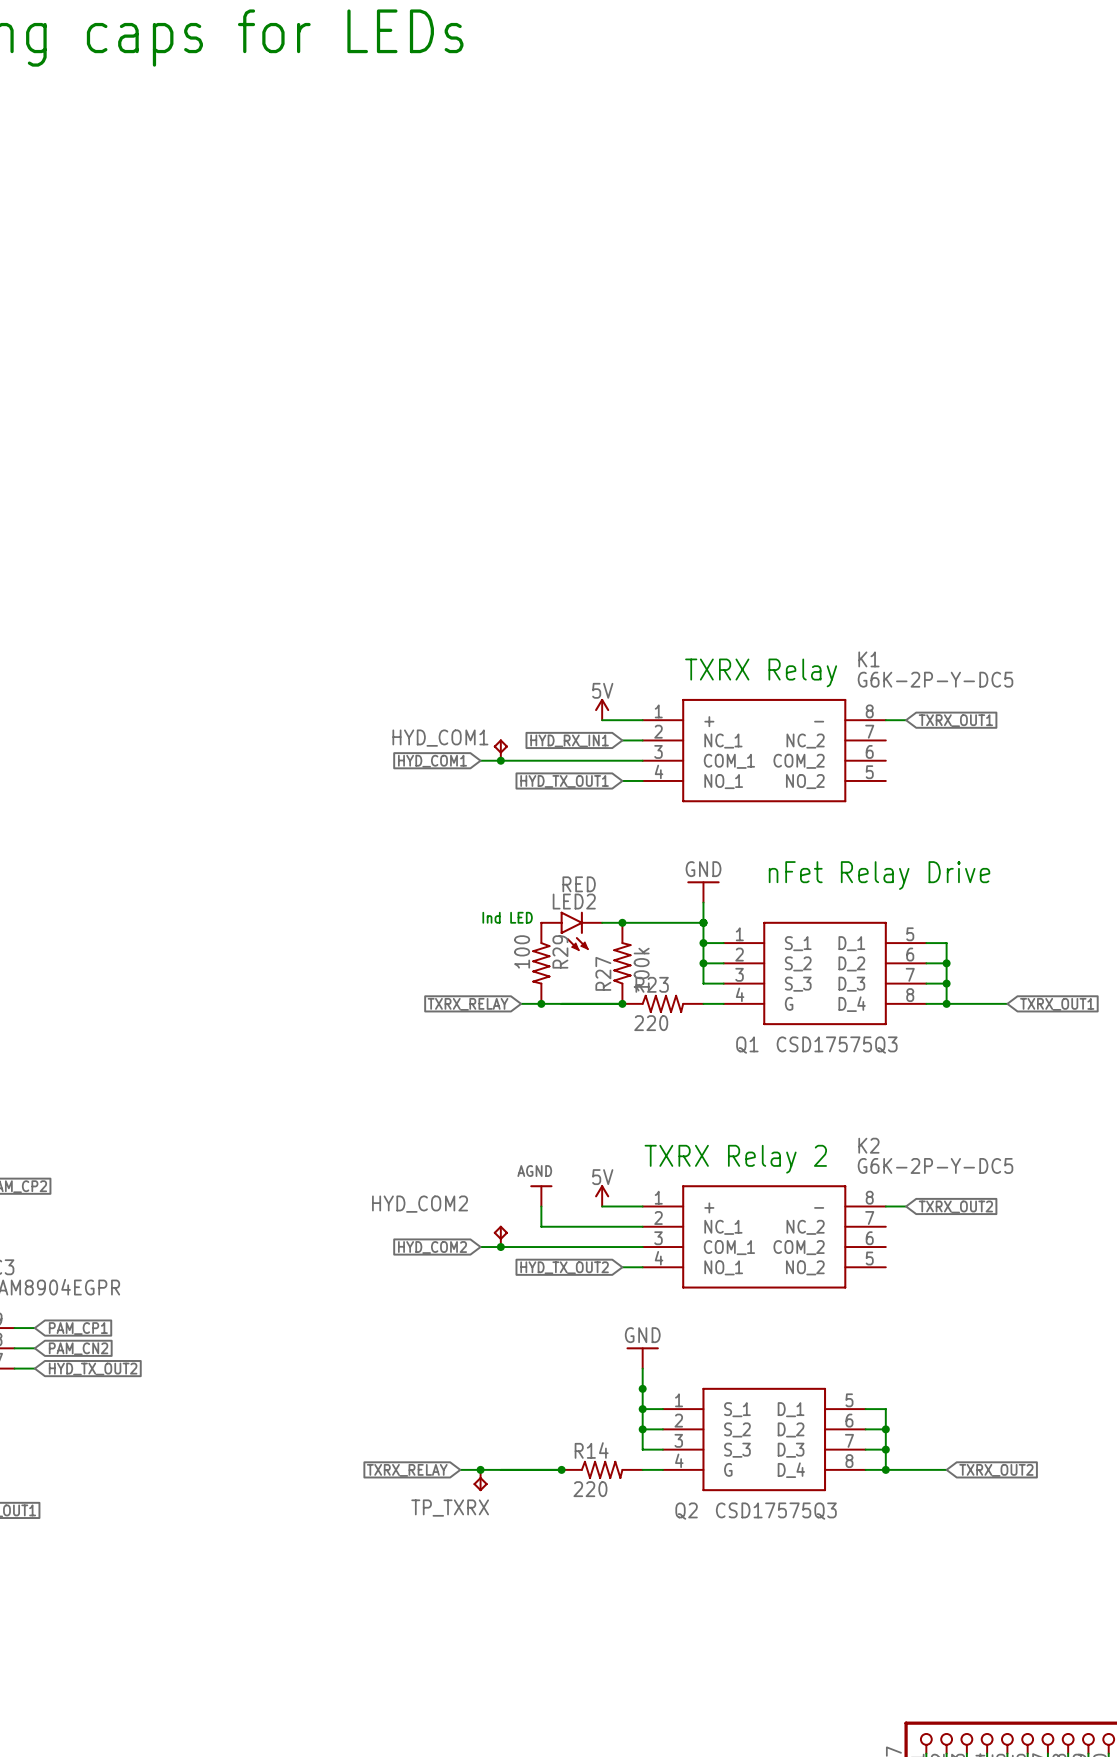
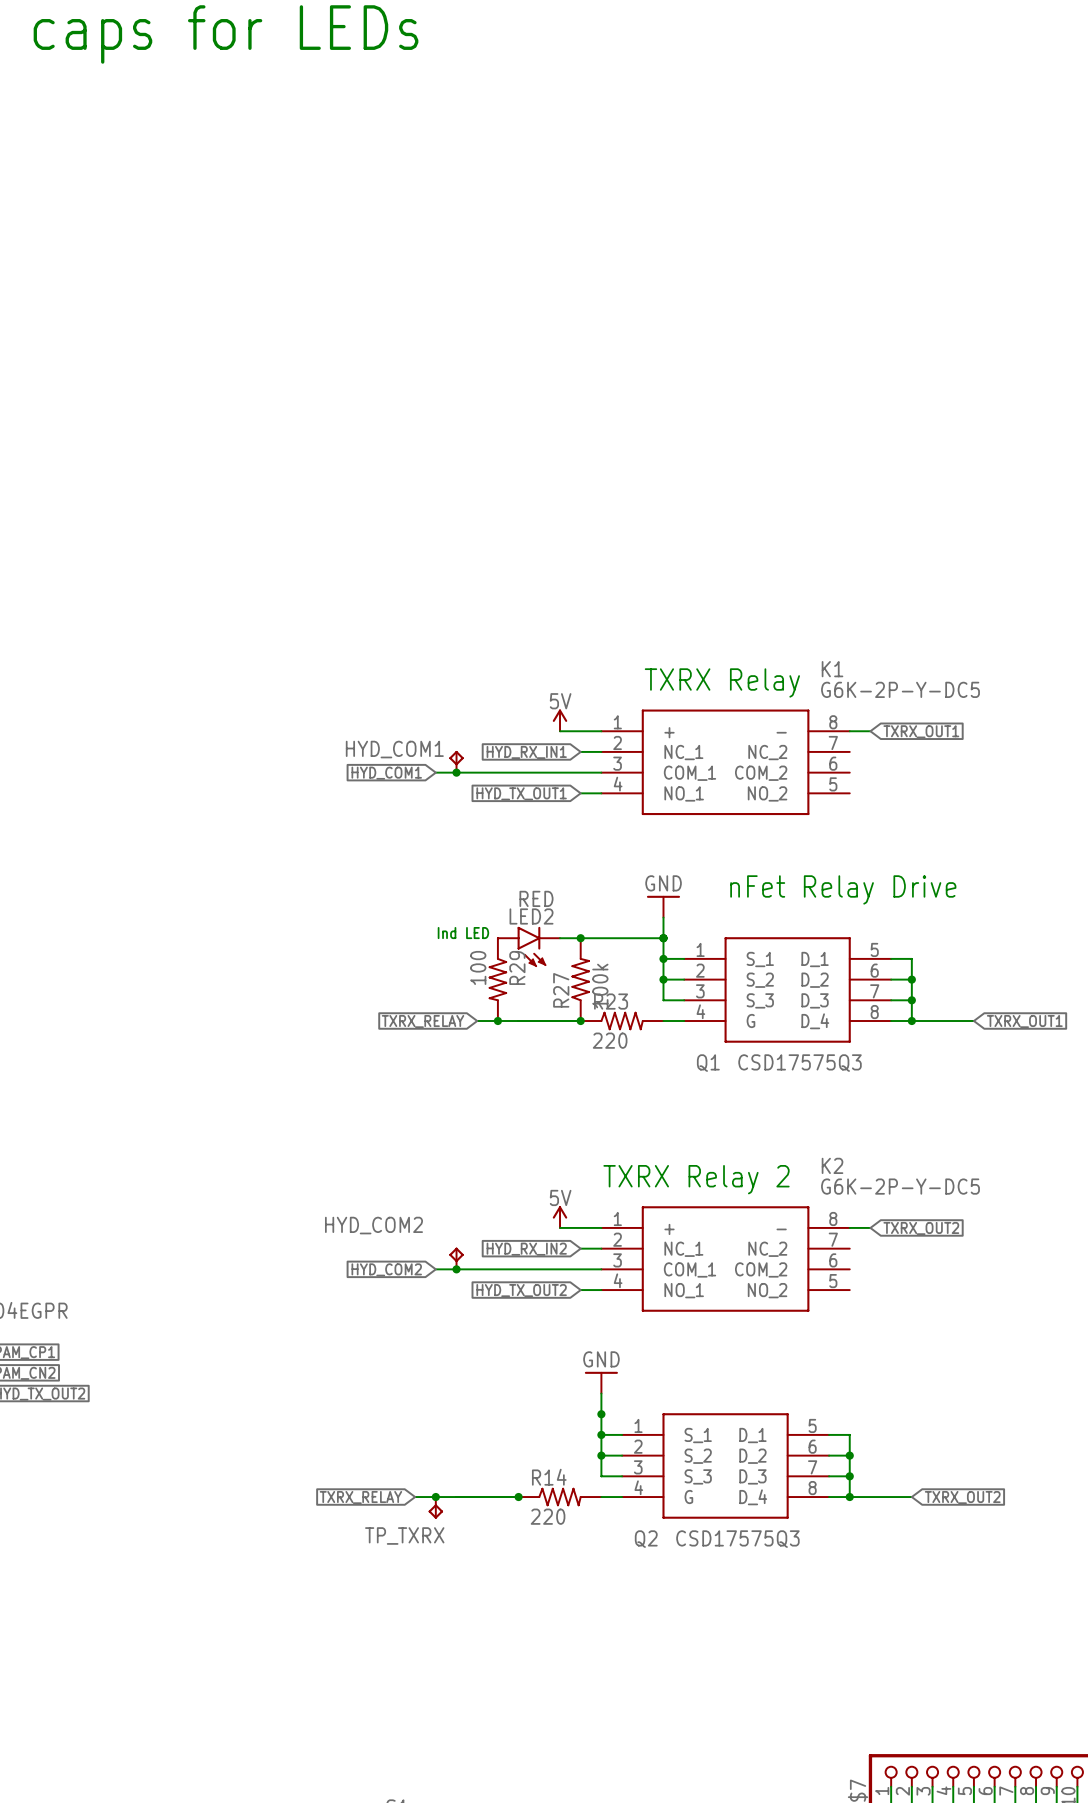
power symbol: AGND (541, 1195) -> none
wire: (541, 1206) (541, 1226) (622, 1226) -> none
global label: none -> HYD_RX_IN2 (526, 1249)

